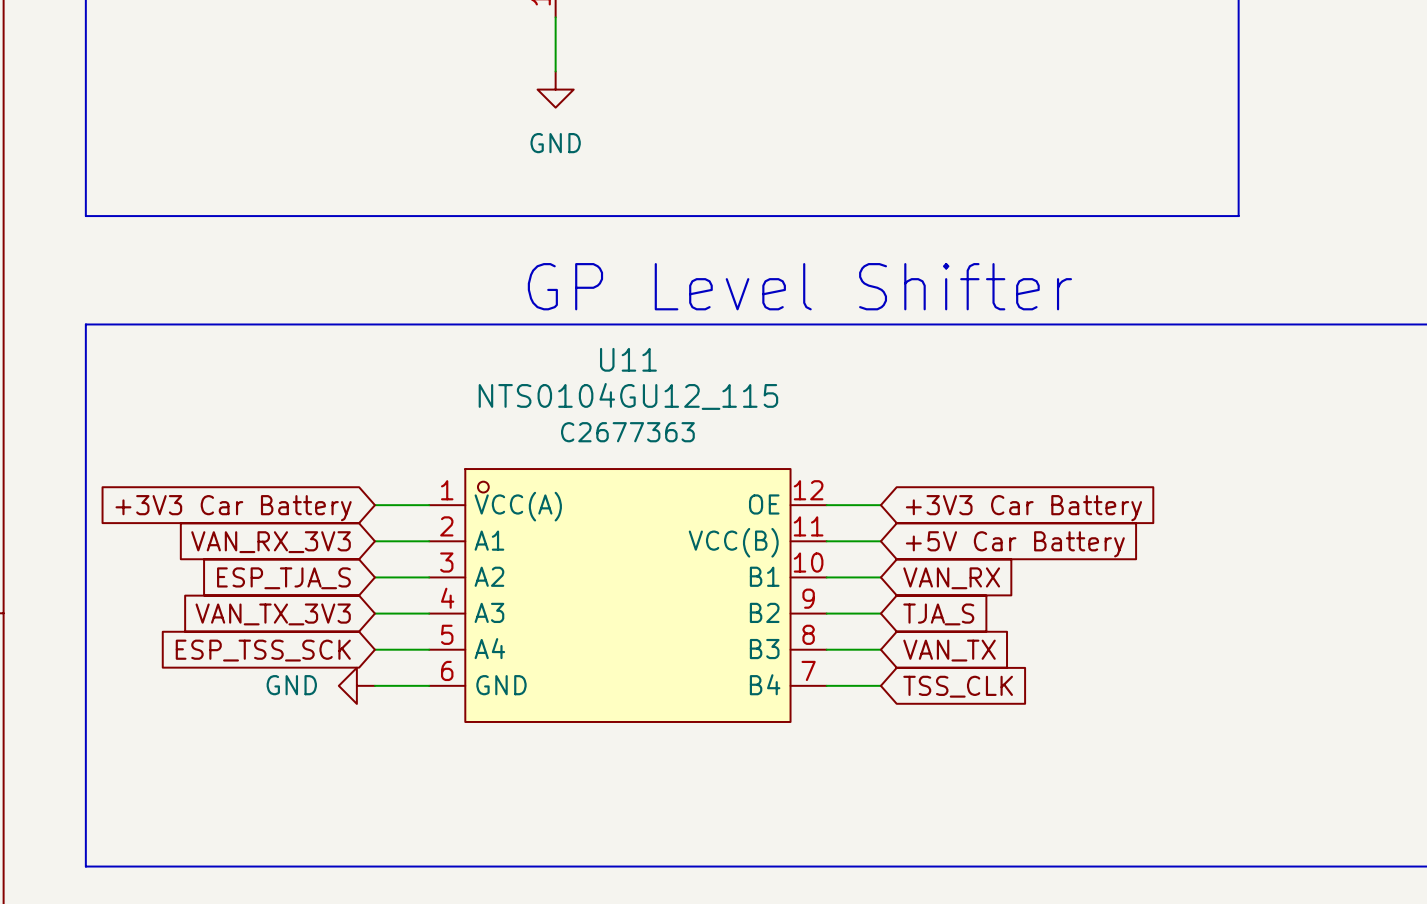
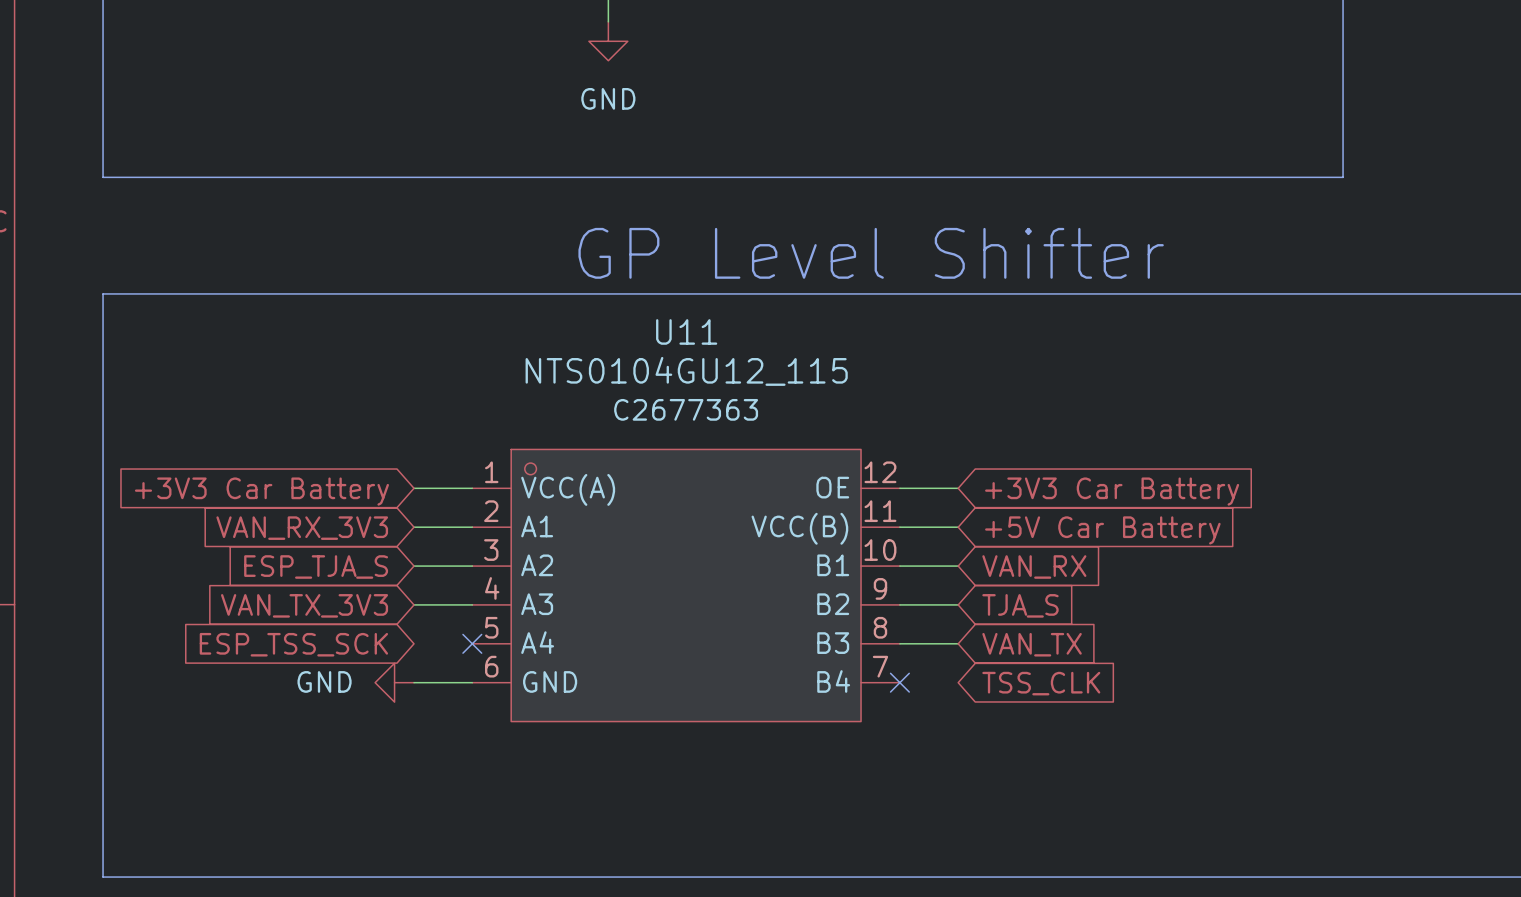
wire: (374, 649) (429, 649) -> none
no-connect mark: none -> (472, 643)
wire: (826, 685) (880, 685) -> none
no-connect mark: none -> (899, 682)

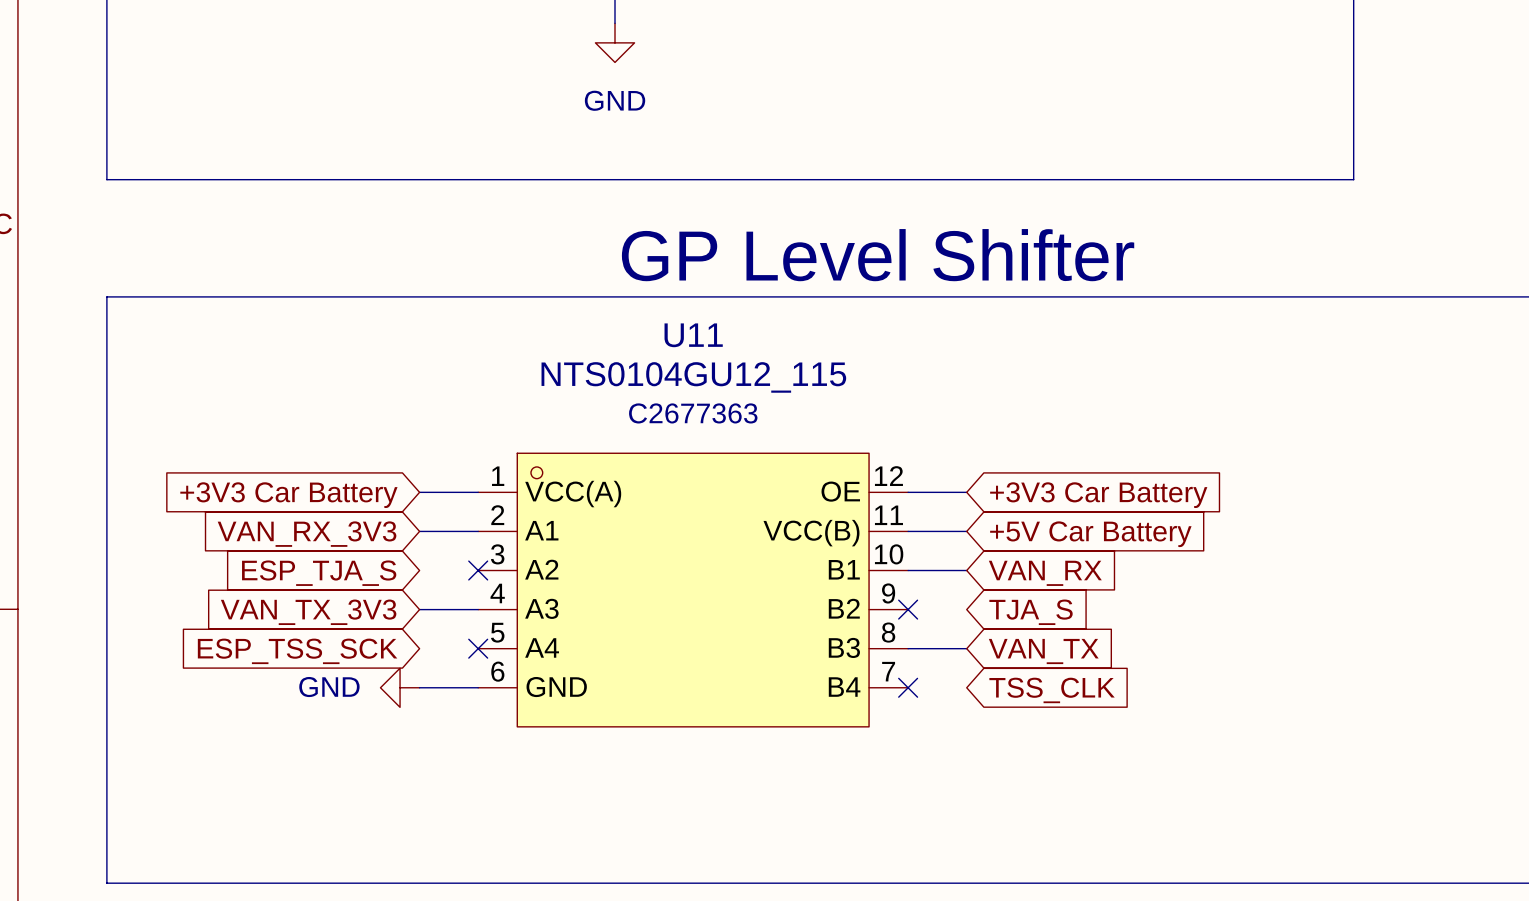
wire: (414, 566) (472, 566) -> none
no-connect mark: none -> (478, 570)
wire: (899, 604) (958, 604) -> none
no-connect mark: none -> (908, 609)

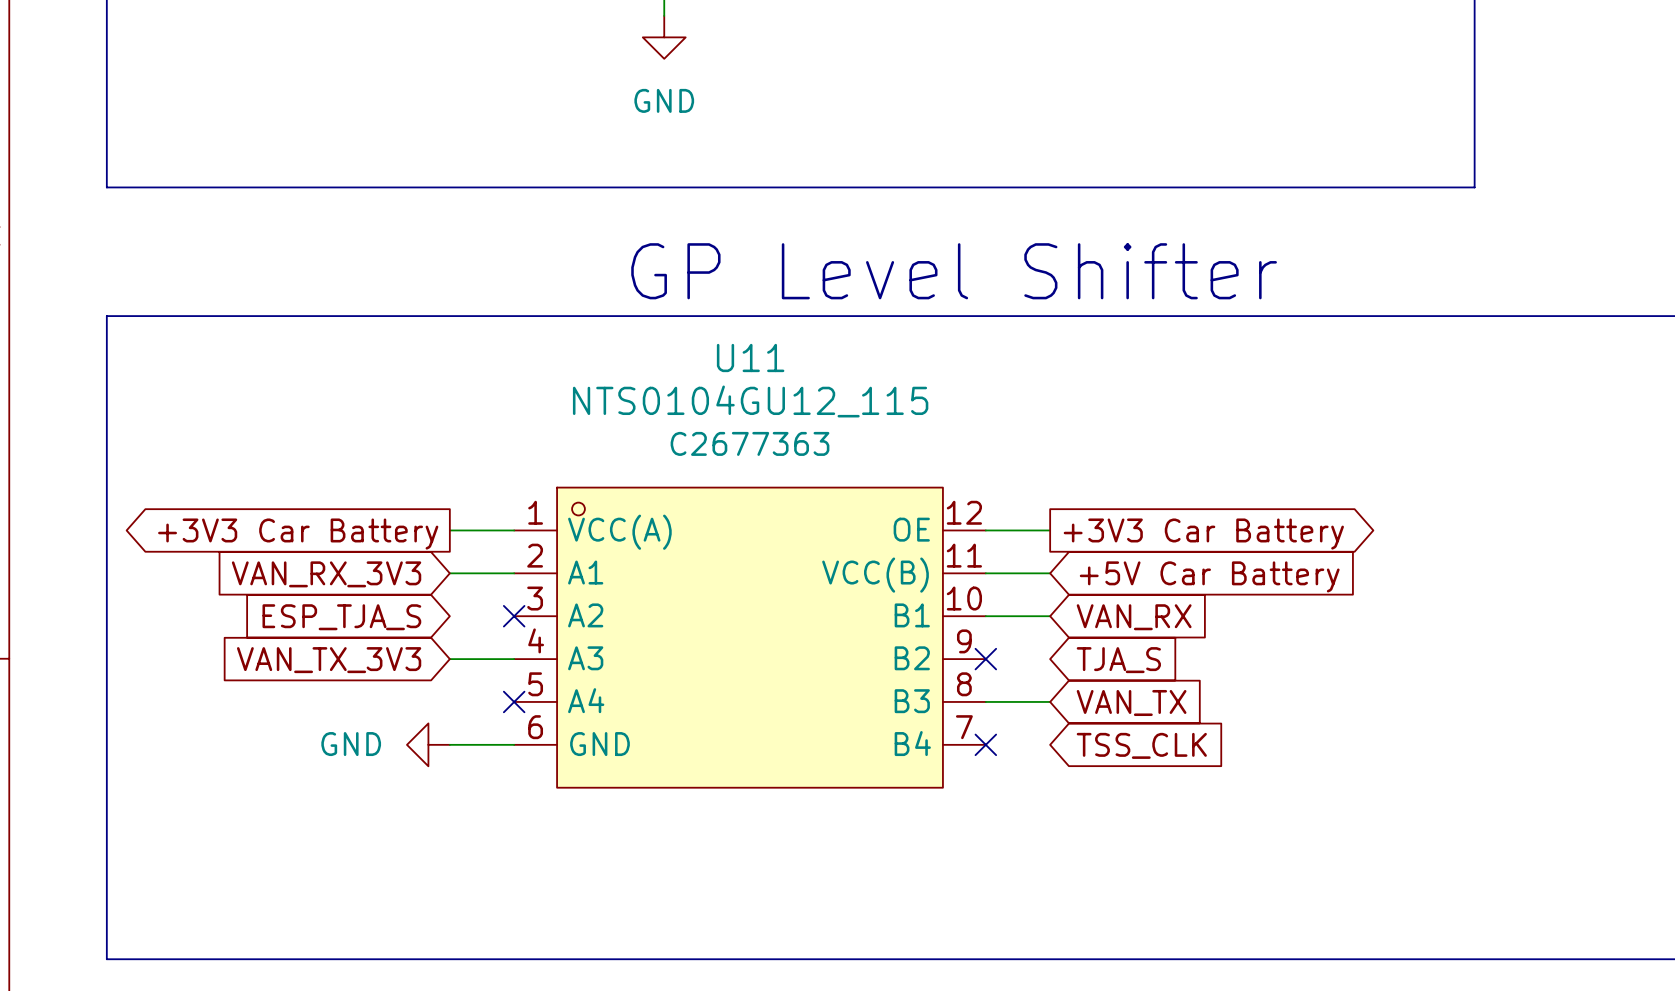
global label shape: input (288, 495) -> output (298, 534)
global label shape: input (1098, 495) -> output (1203, 534)
global label: ESP_TSS_SCK (297, 651) -> none

